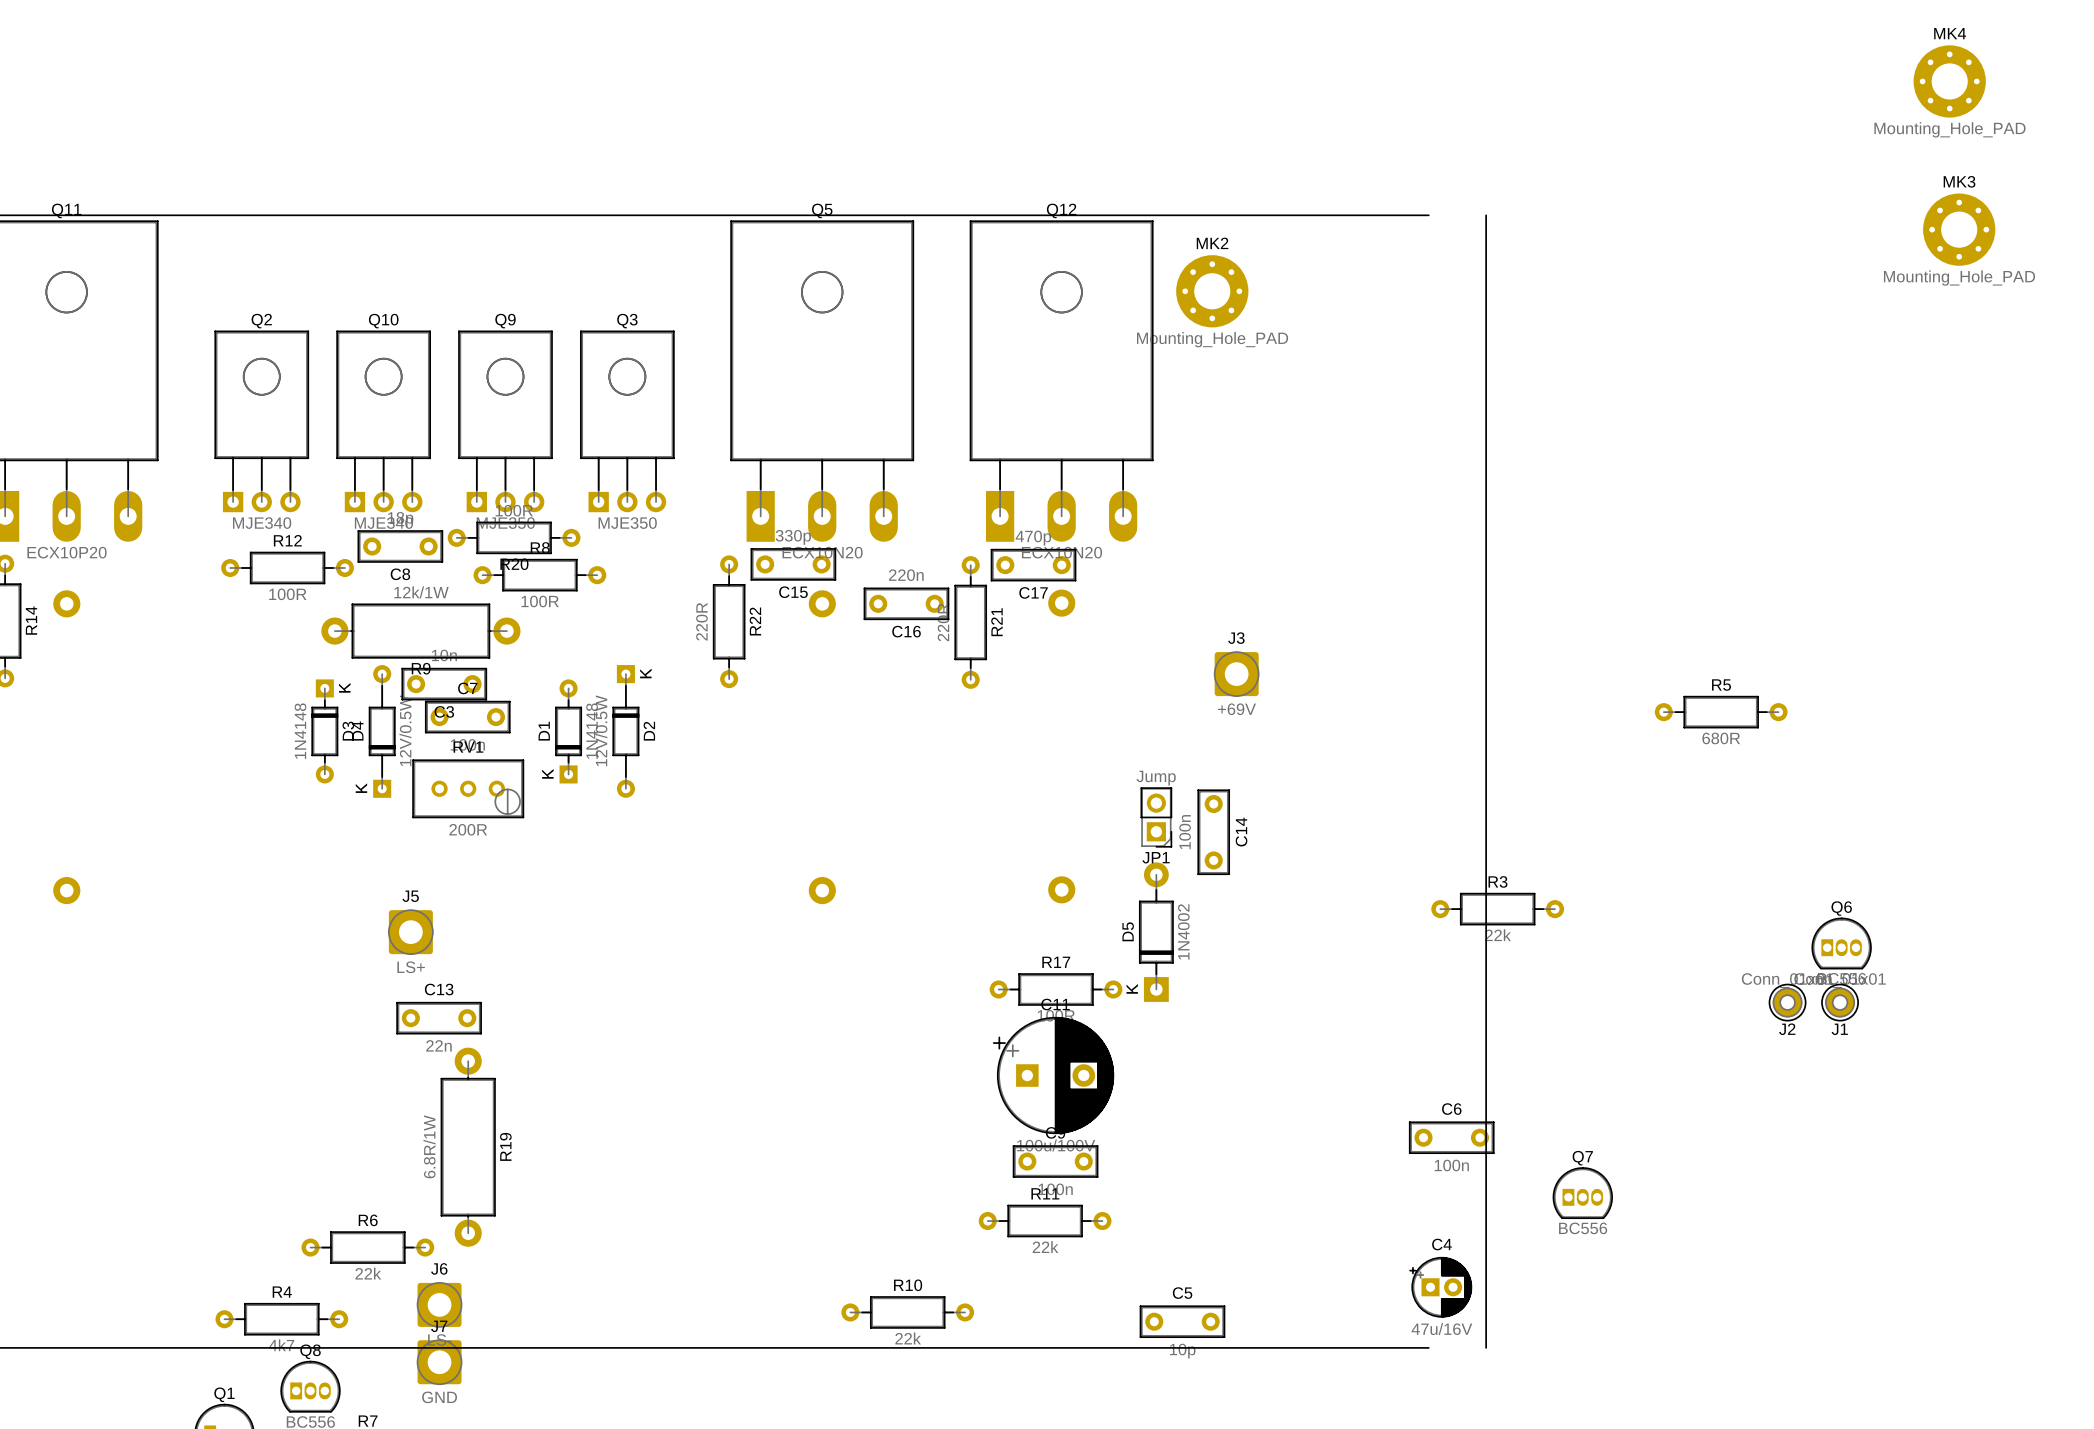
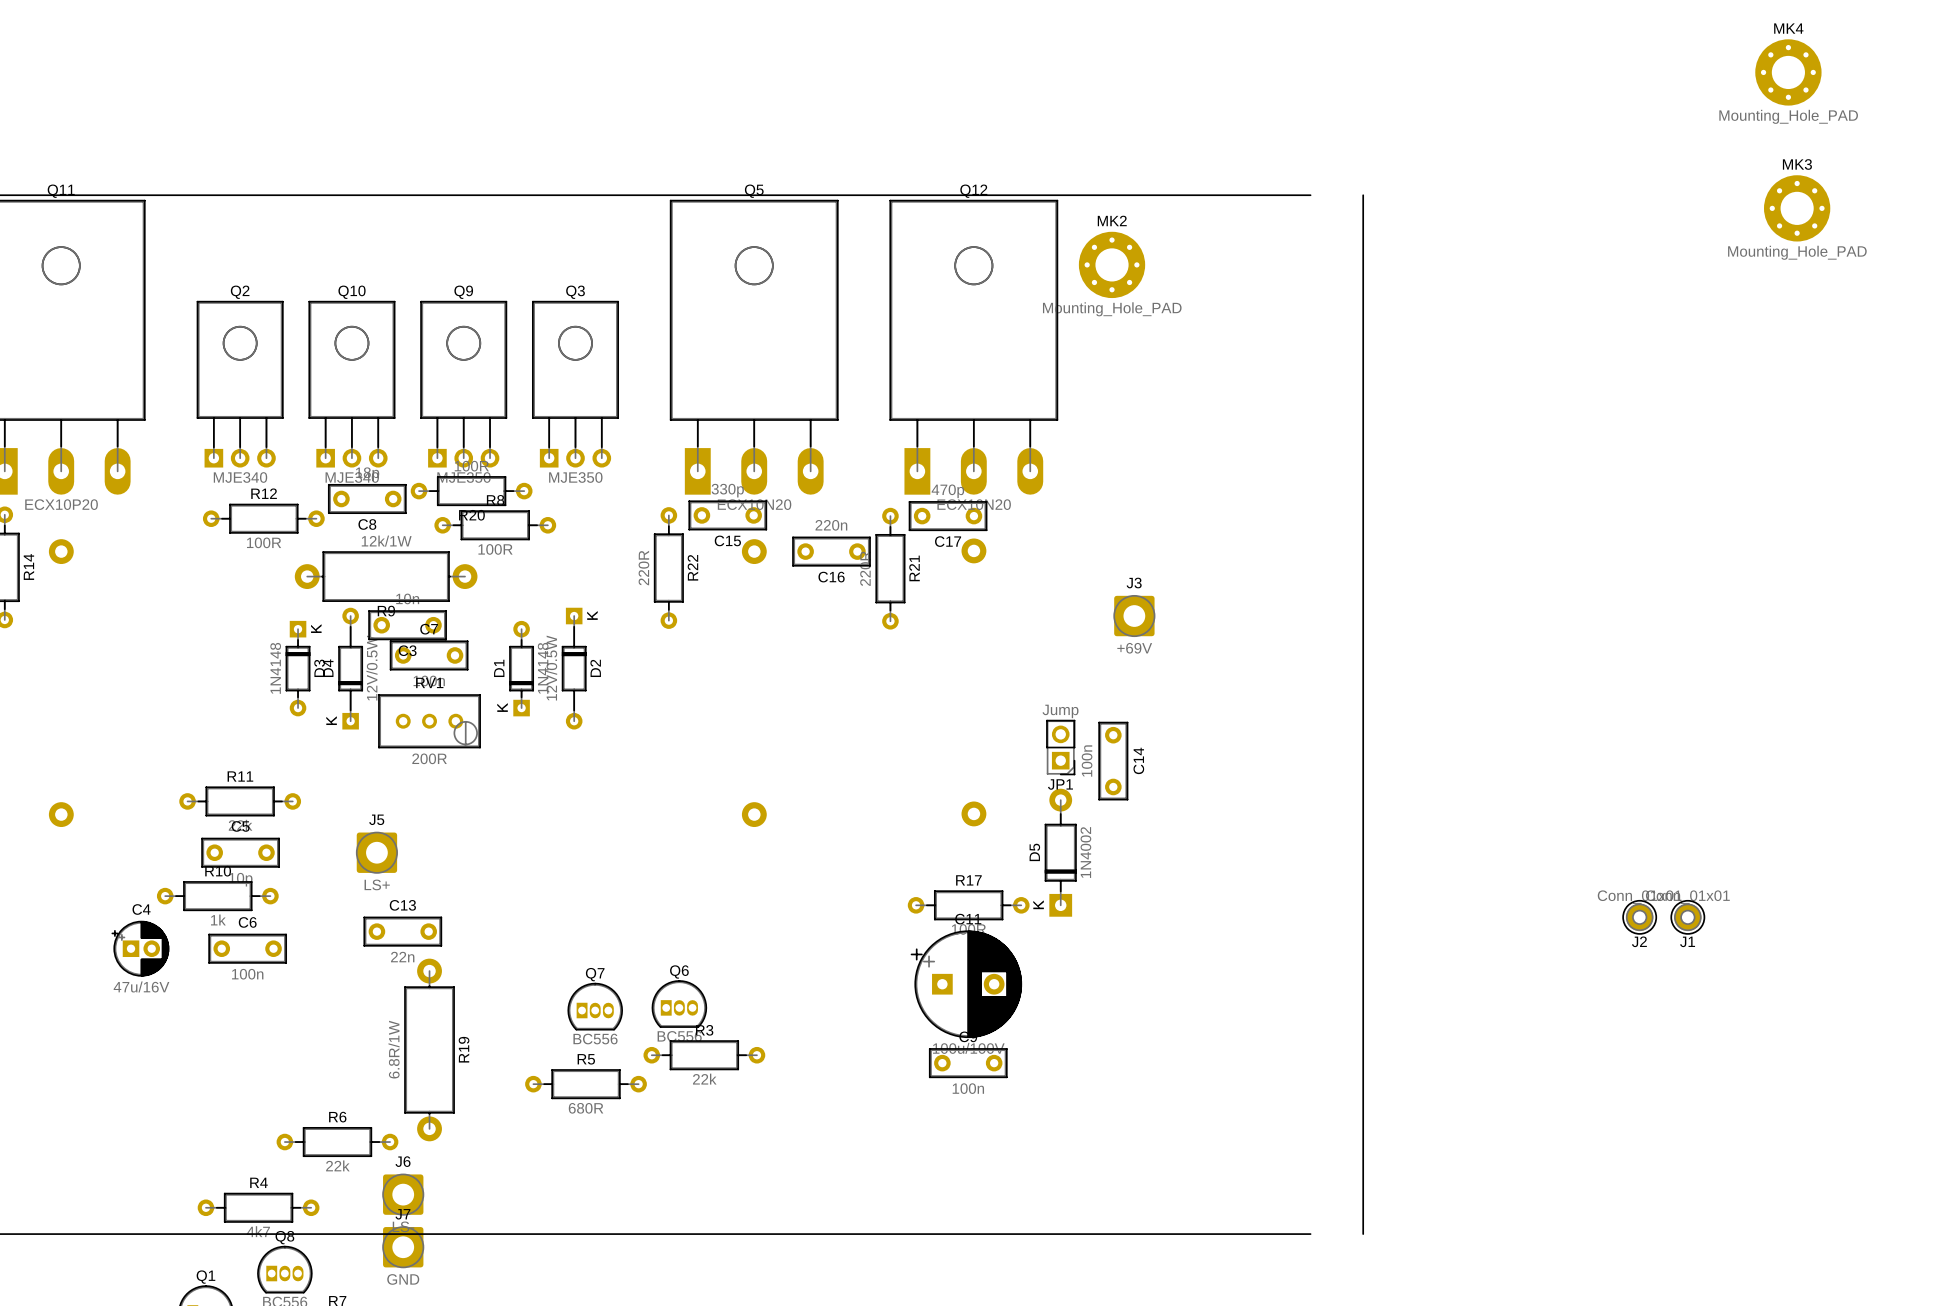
R5 position: (1721, 712) -> (586, 1084)
R3 position: (1497, 909) -> (704, 1055)
Q6 position: (1841, 943) -> (679, 1004)
C6 position: (1451, 1137) -> (247, 948)
Q7 position: (1582, 1193) -> (595, 1006)
R11 position: (1045, 1221) -> (240, 801)
C4 position: (1440, 1287) -> (140, 948)
R10 position: (907, 1312) -> (217, 896)
C5 position: (1182, 1321) -> (240, 852)
R10 value: 22k (908, 1338) -> 1k (218, 919)

